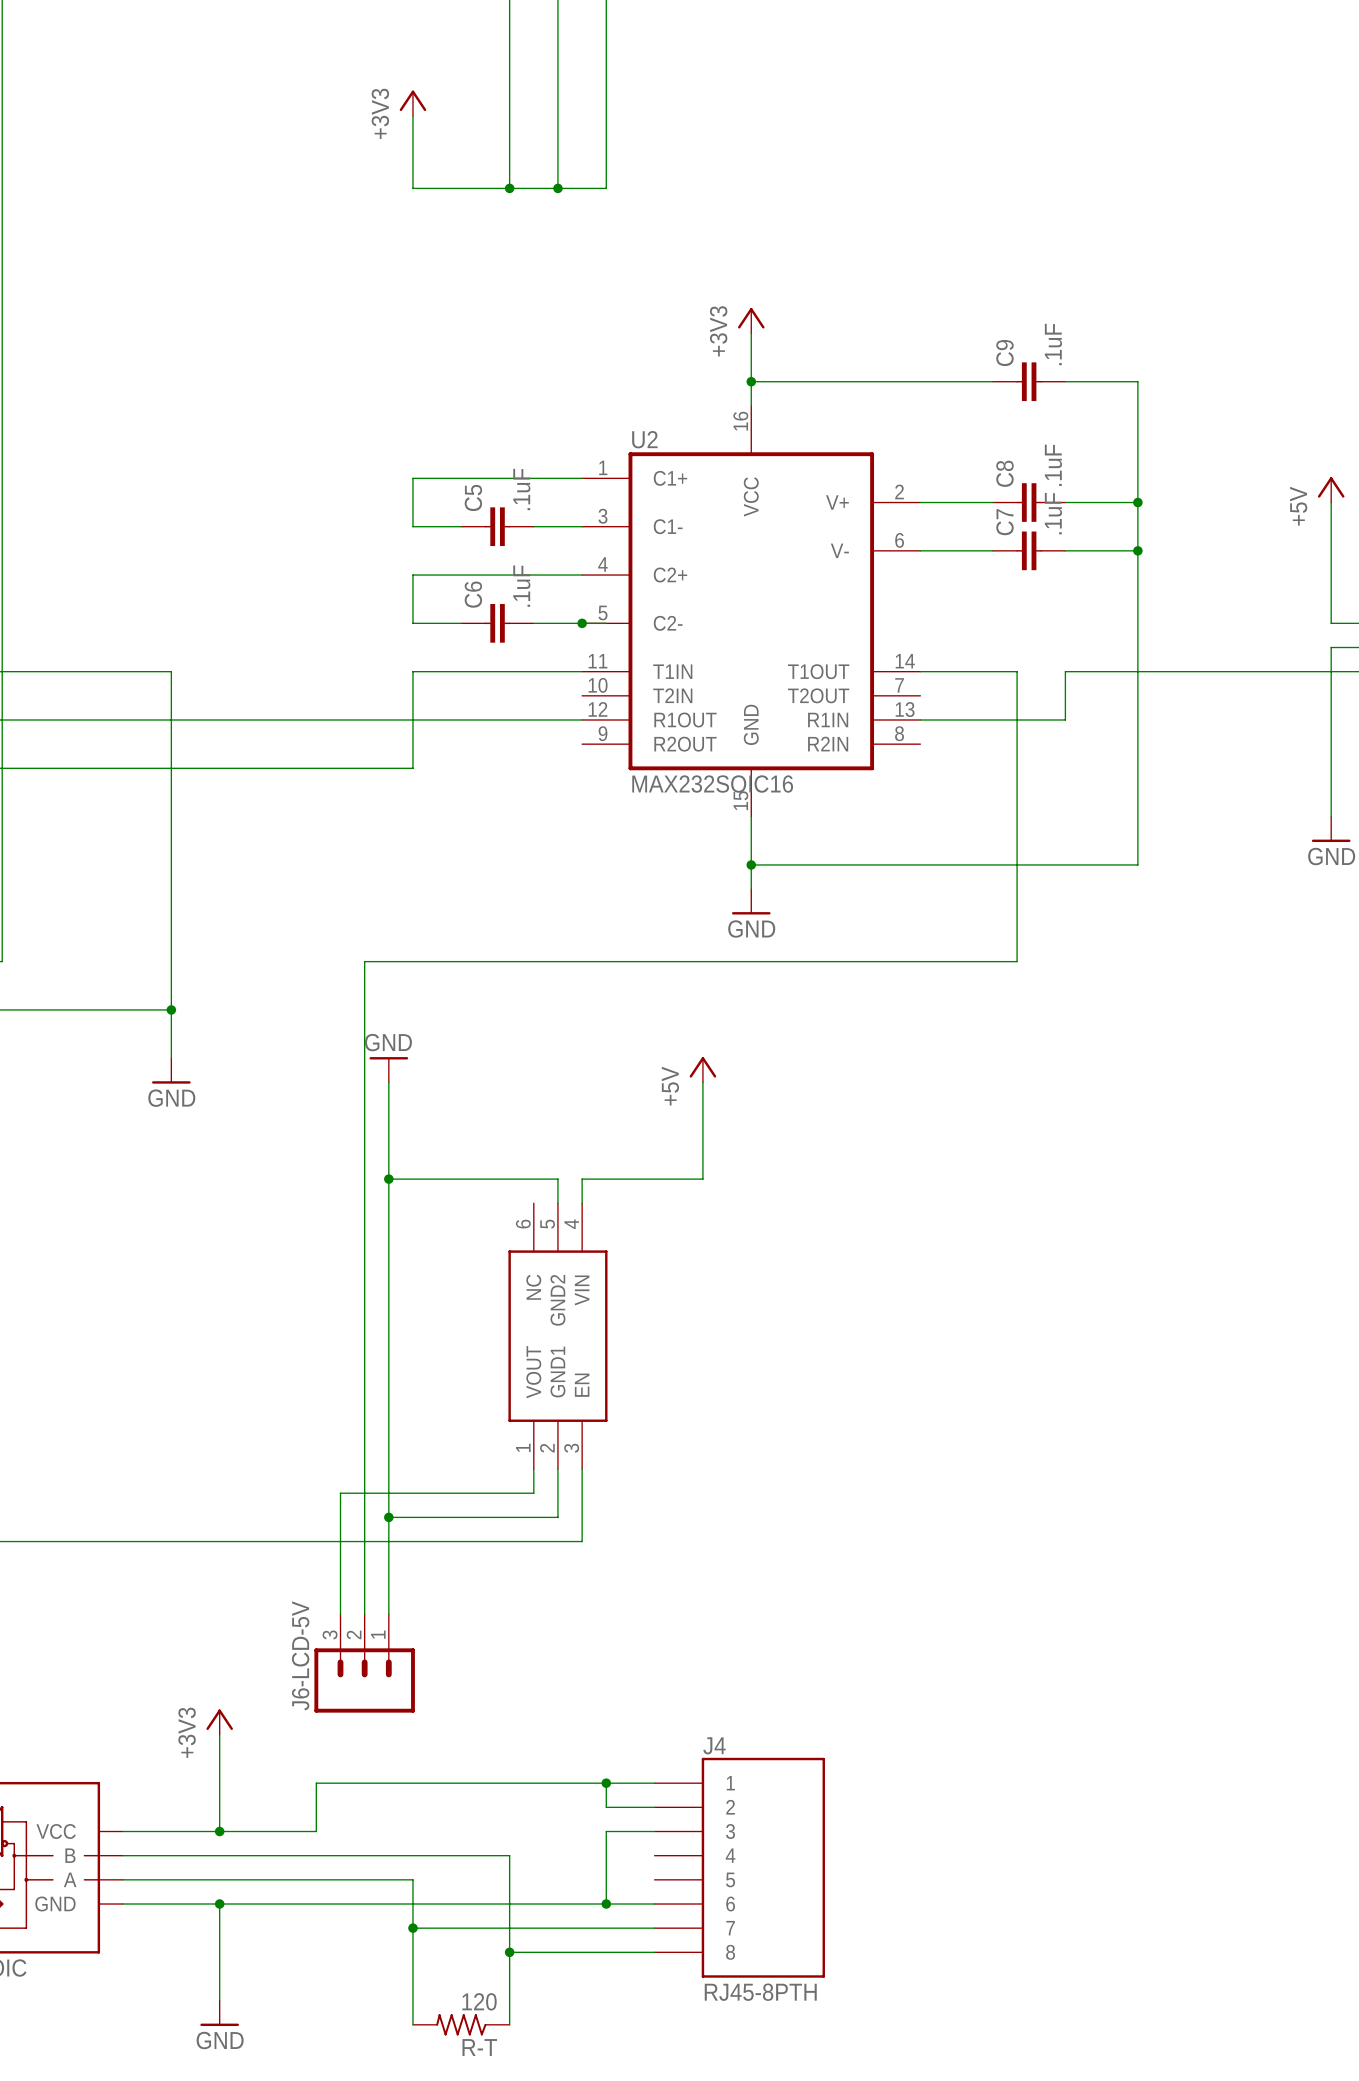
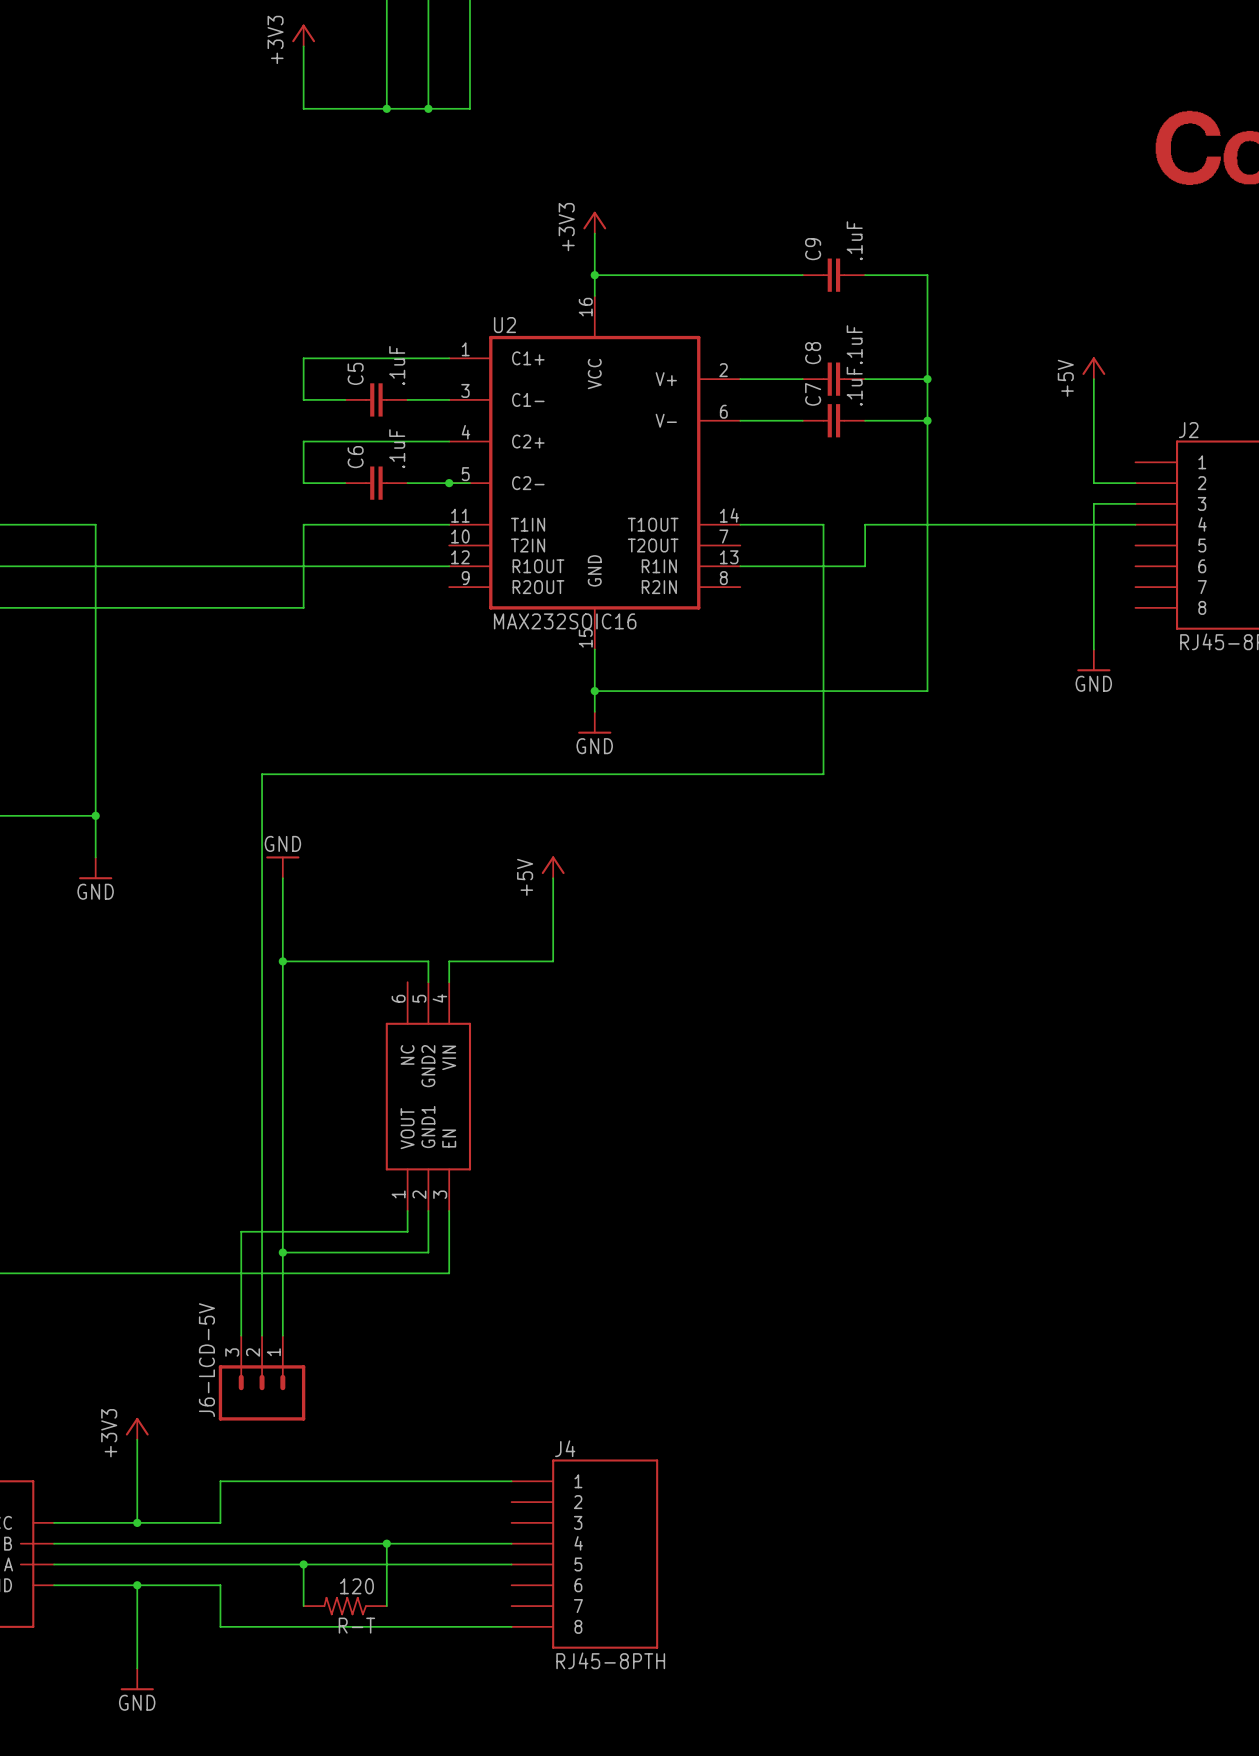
wire: (606, 1783) (606, 1807) (654, 1807) -> none
junction: (606, 1783) -> none
wire: (654, 1831) (606, 1831) (606, 1904) -> none
wire: none -> (386, 1543) (511, 1543)
junction: none -> (386, 1543)
wire: none -> (303, 1564) (511, 1564)
wire: (316, 1904) (654, 1904) -> (220, 1585) (220, 1626) (386, 1626)
junction: (606, 1904) -> none
junction position: (412, 1928) -> (303, 1564)
wire: (509, 1928) (509, 2024) -> none
wire: (654, 1928) (412, 1928) (412, 2024) -> none
junction: (509, 1952) -> none
R-T position: (461, 2024) -> (345, 1606)

